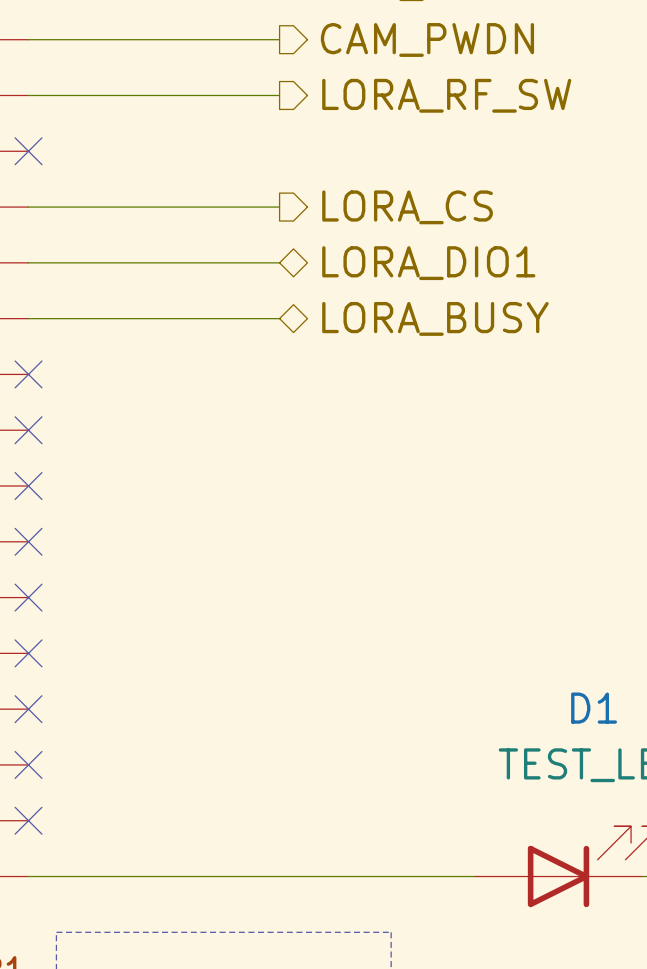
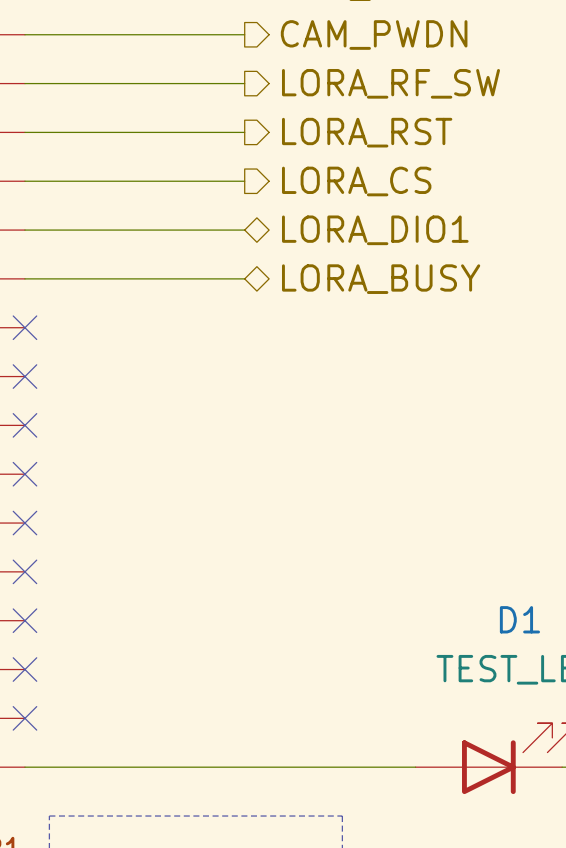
wire: none -> (24, 132) (244, 132)
no-connect mark: (28, 151) -> none
hierarchical label: none -> LORA_RST (367, 132)

